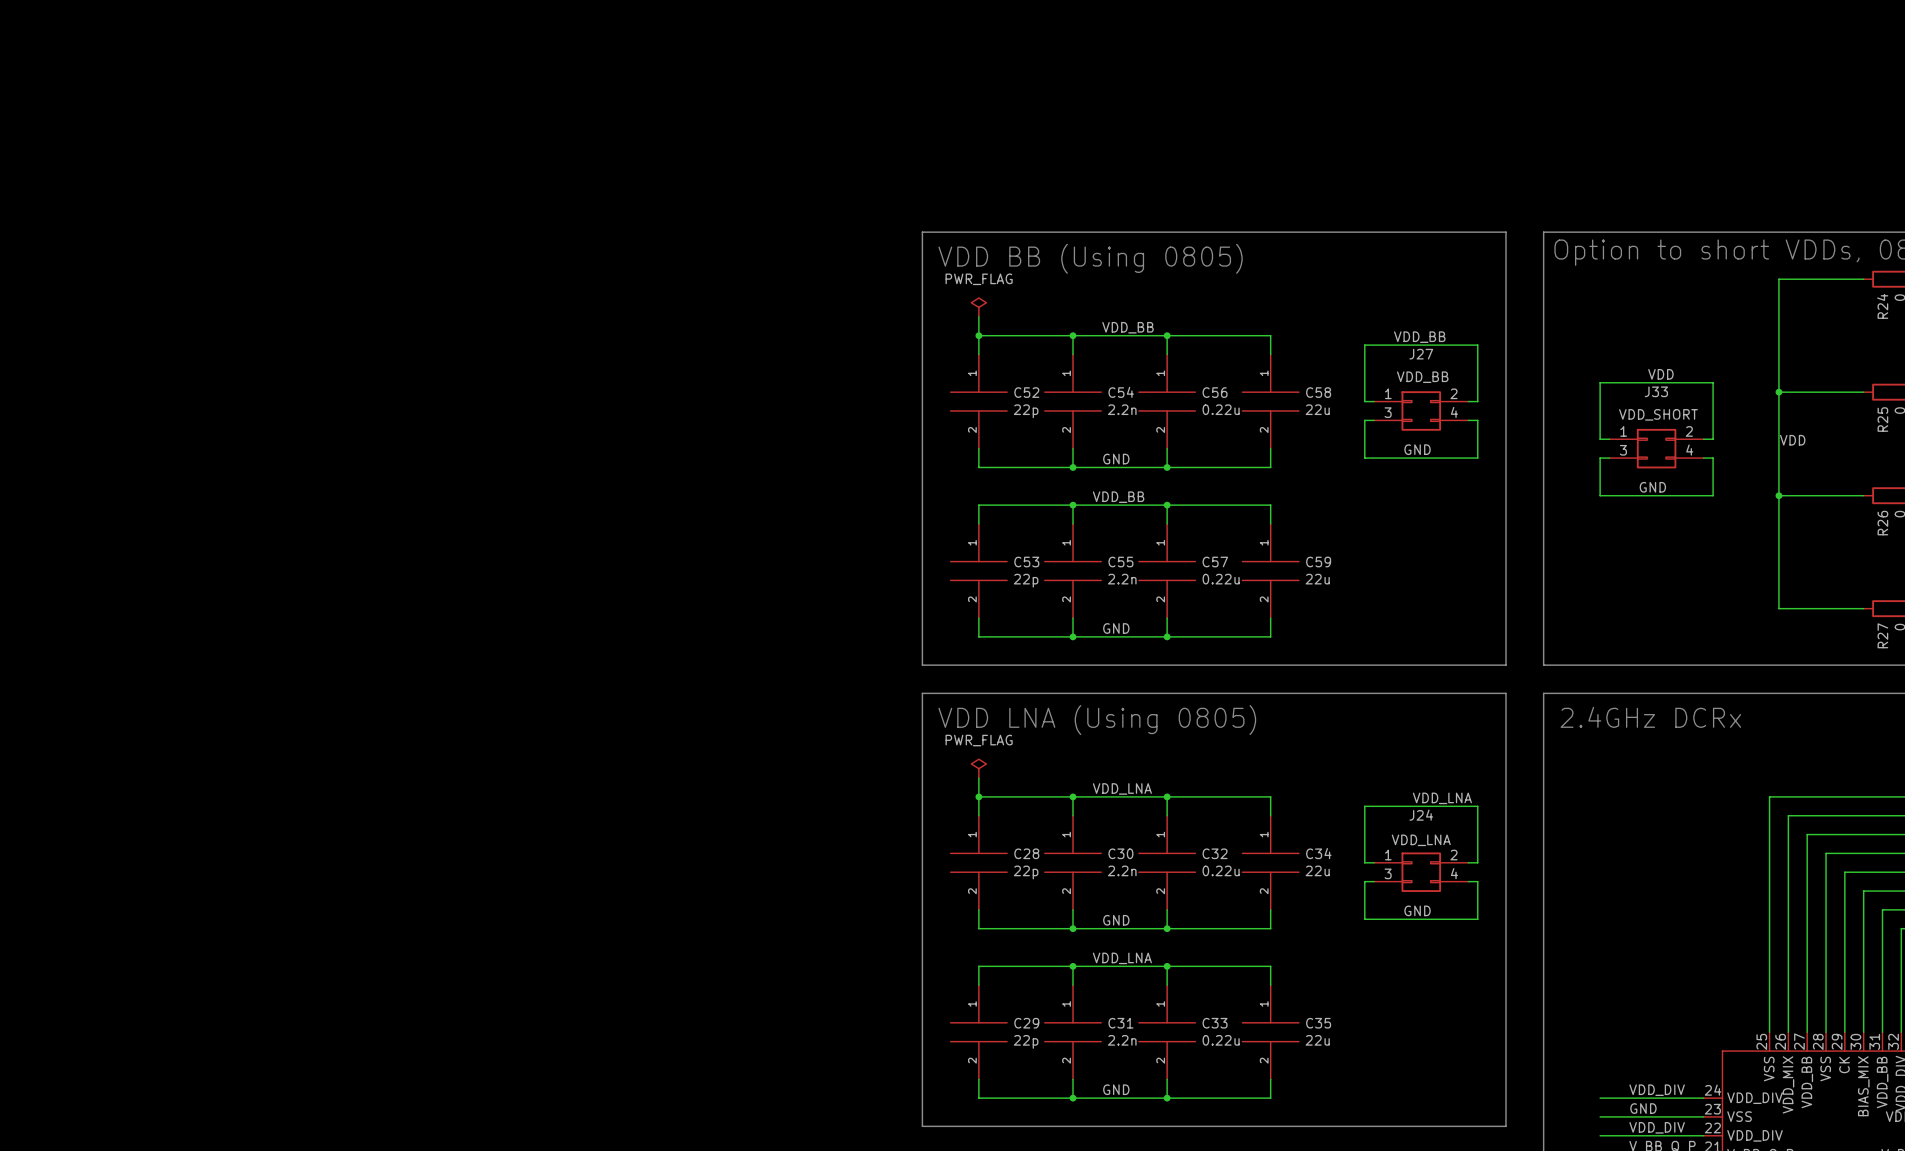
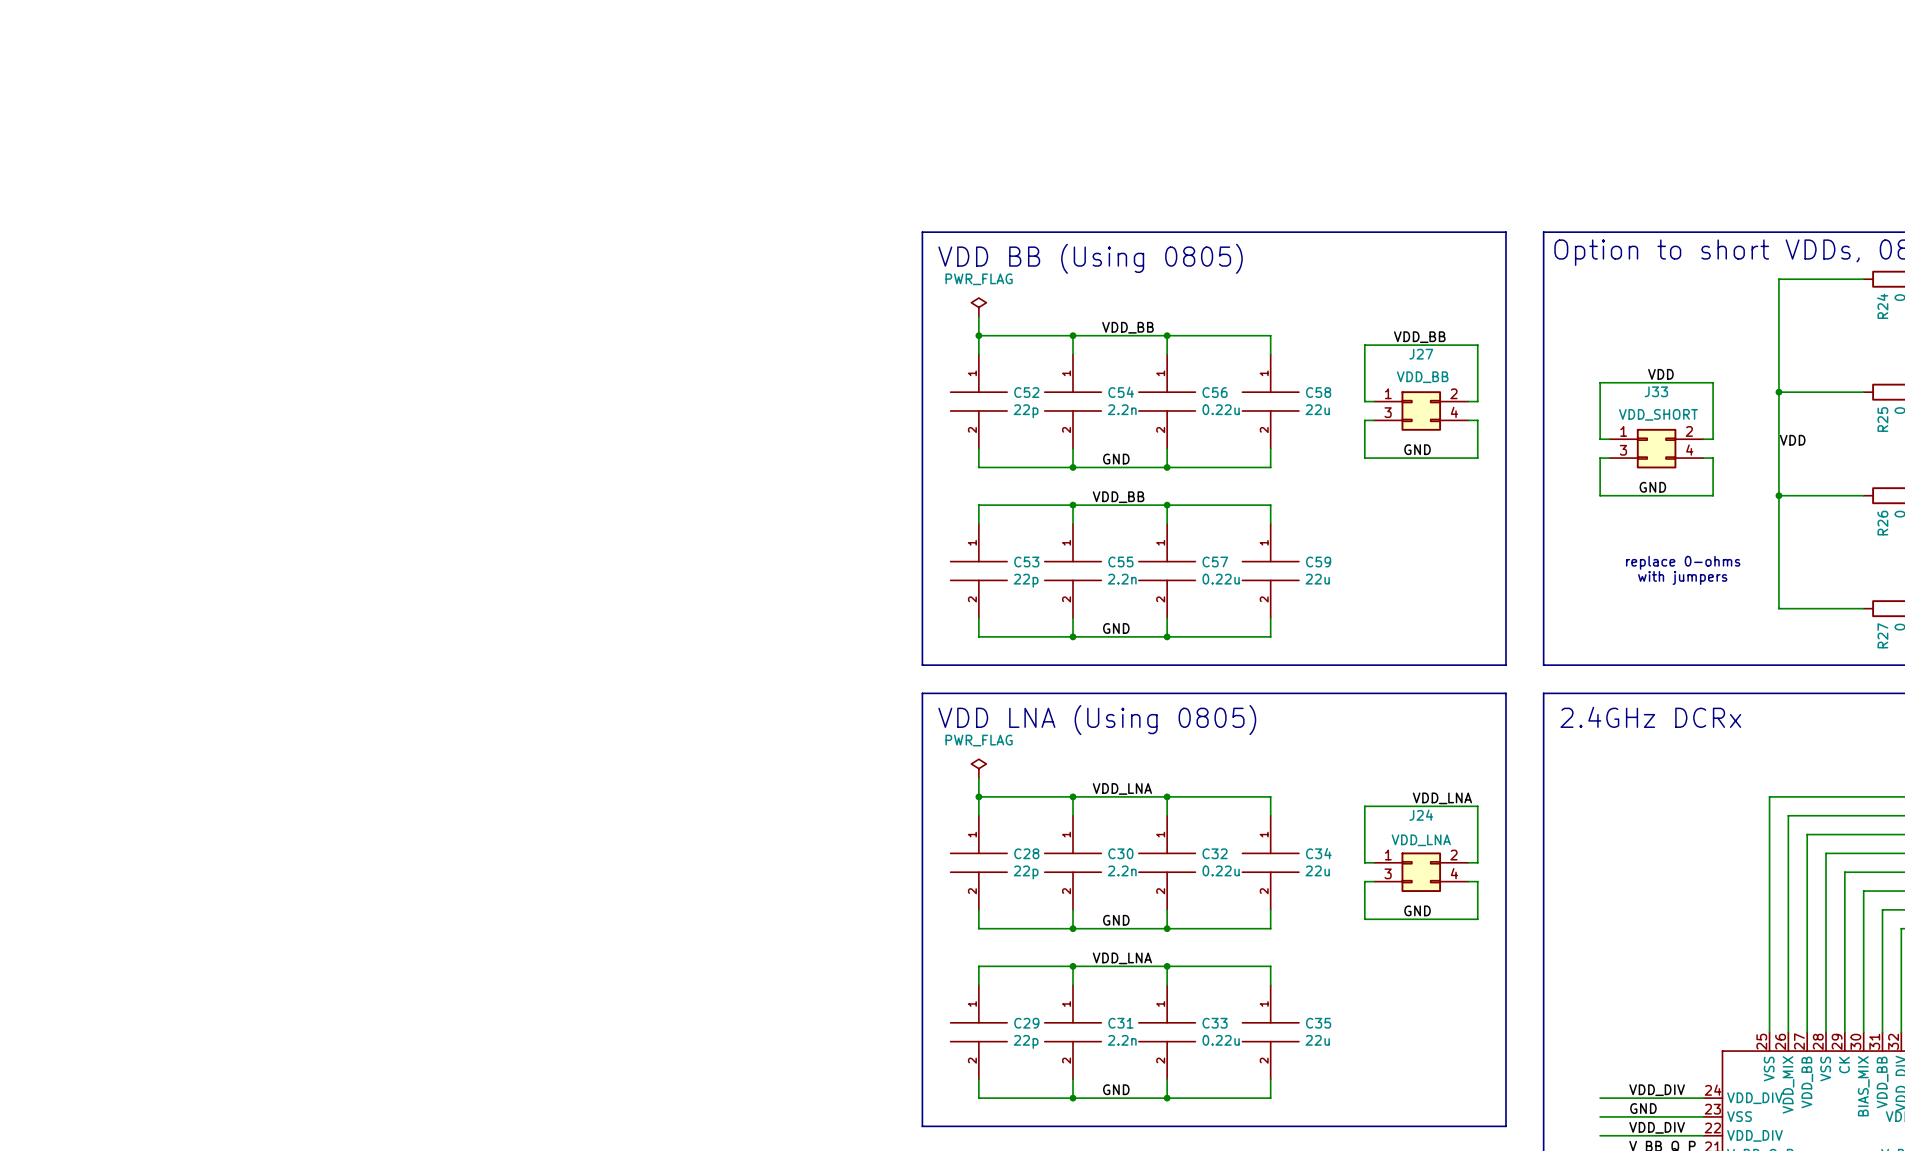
text: none -> replace 0-ohms (1683, 562)
text: none -> with jumpers (1682, 577)

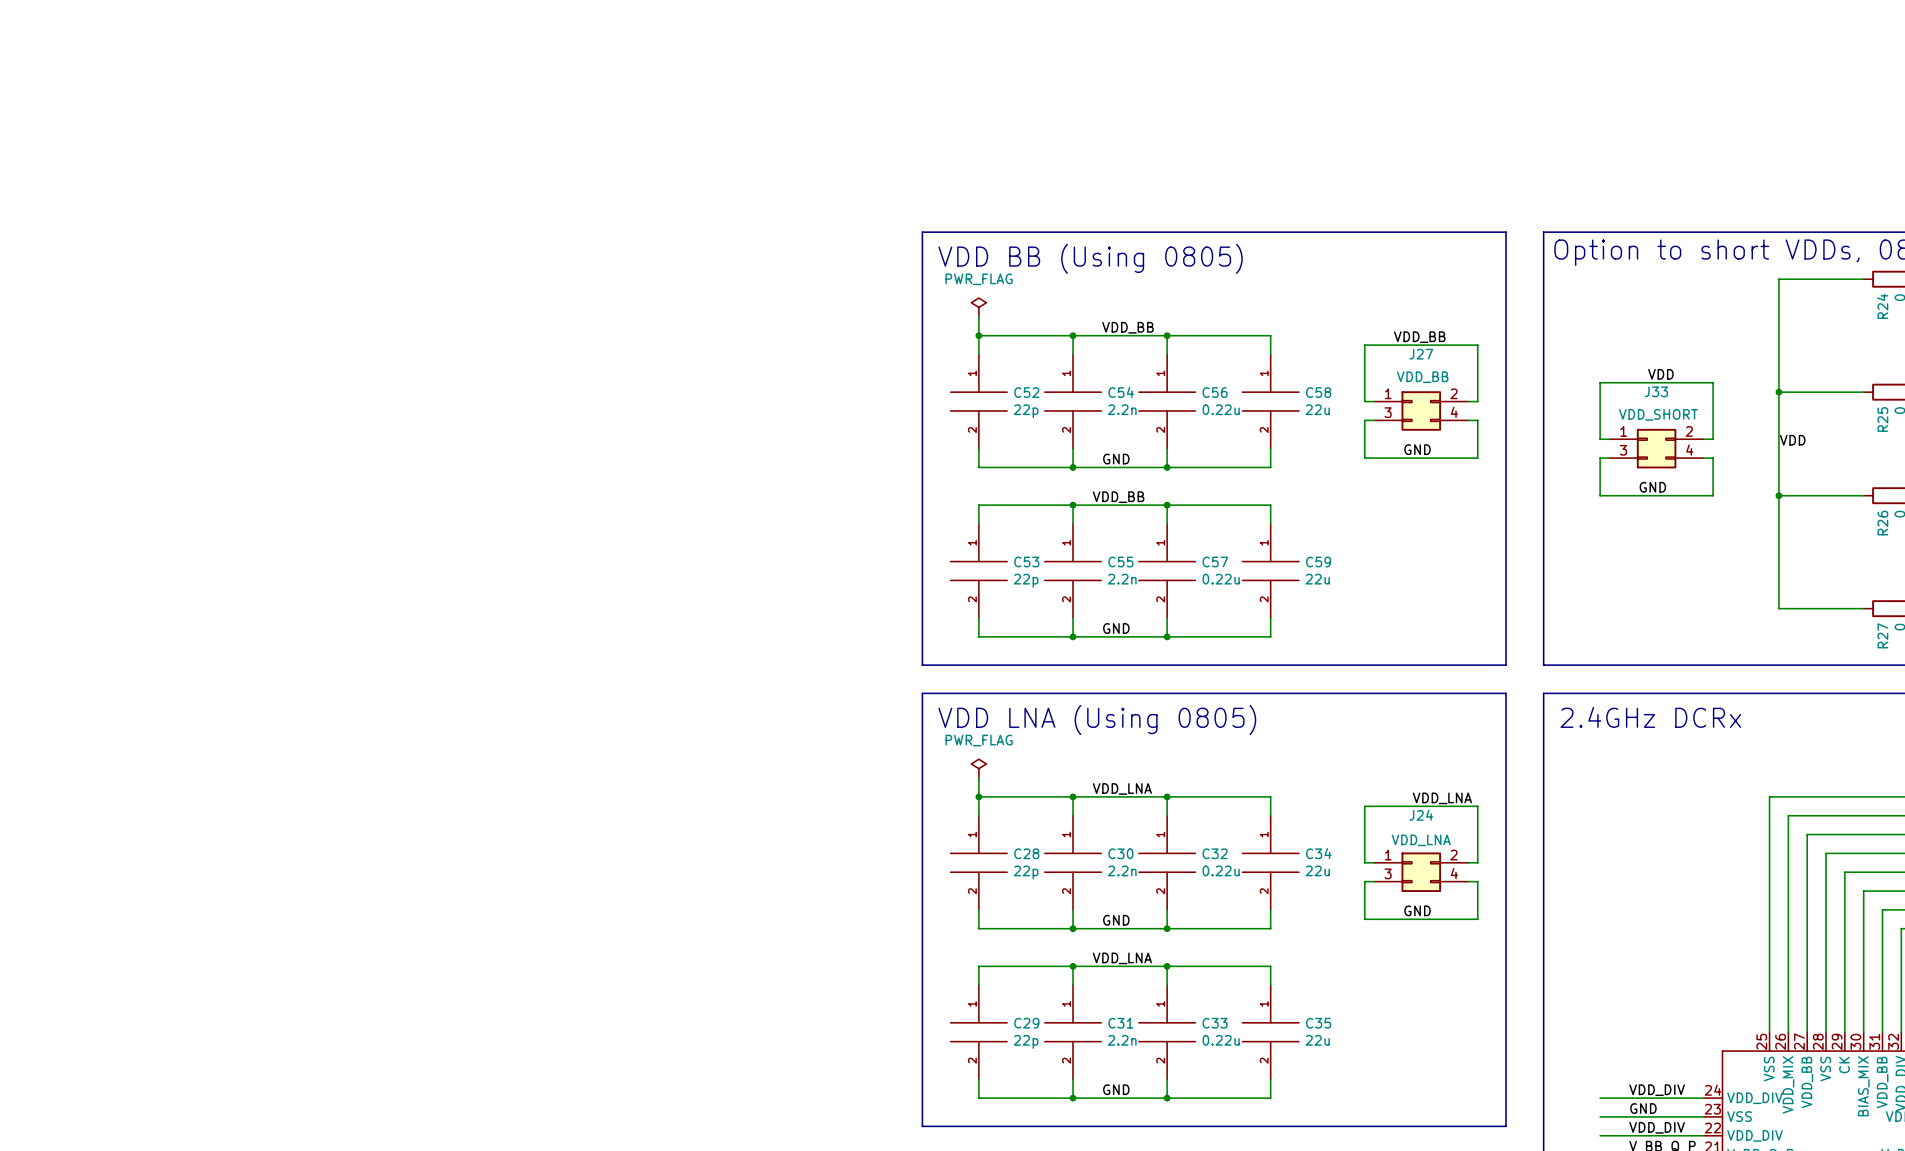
text: replace 0-ohms (1683, 562) -> none
text: with jumpers (1682, 577) -> none

